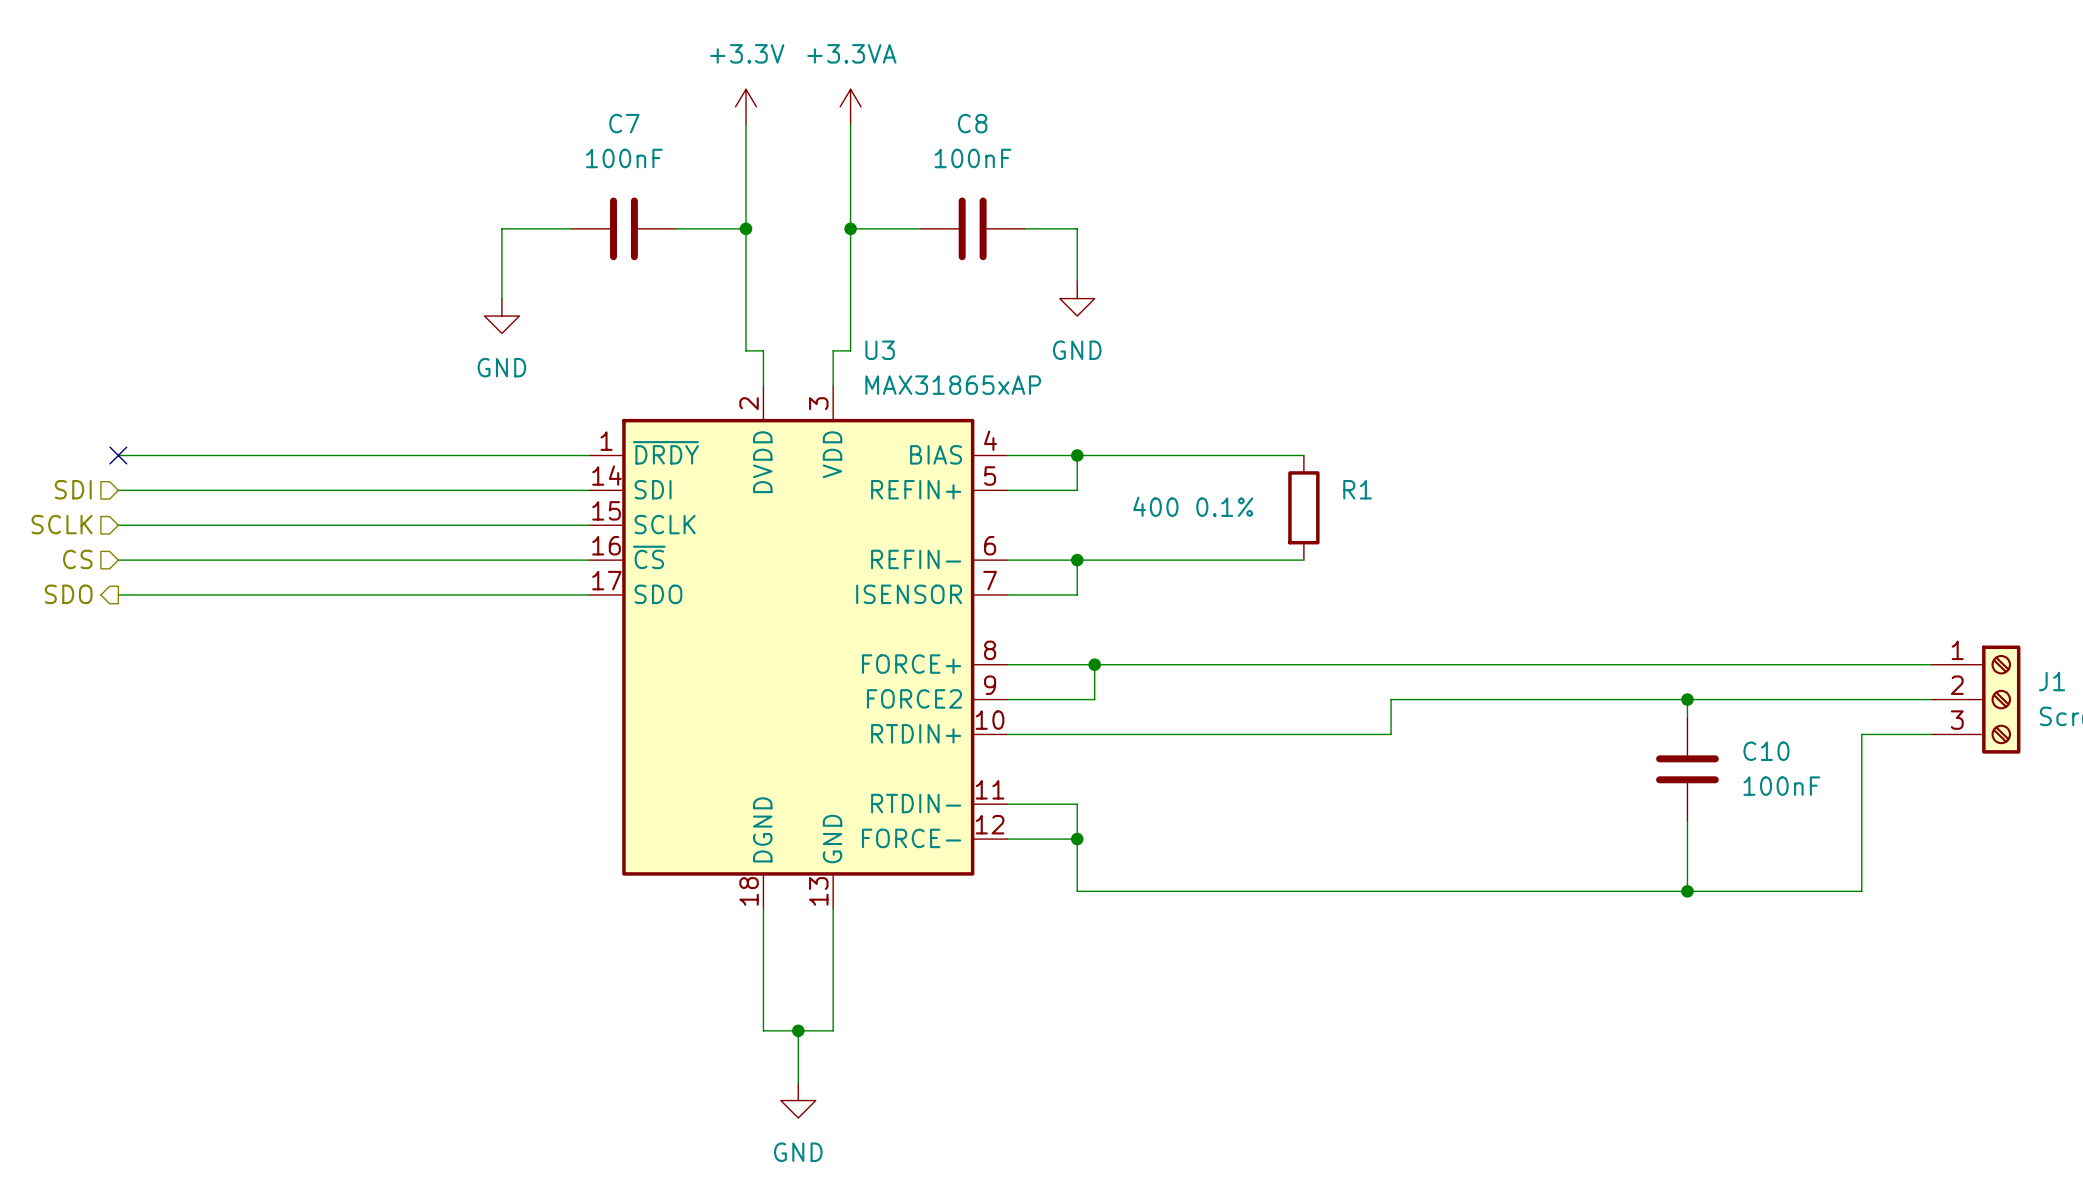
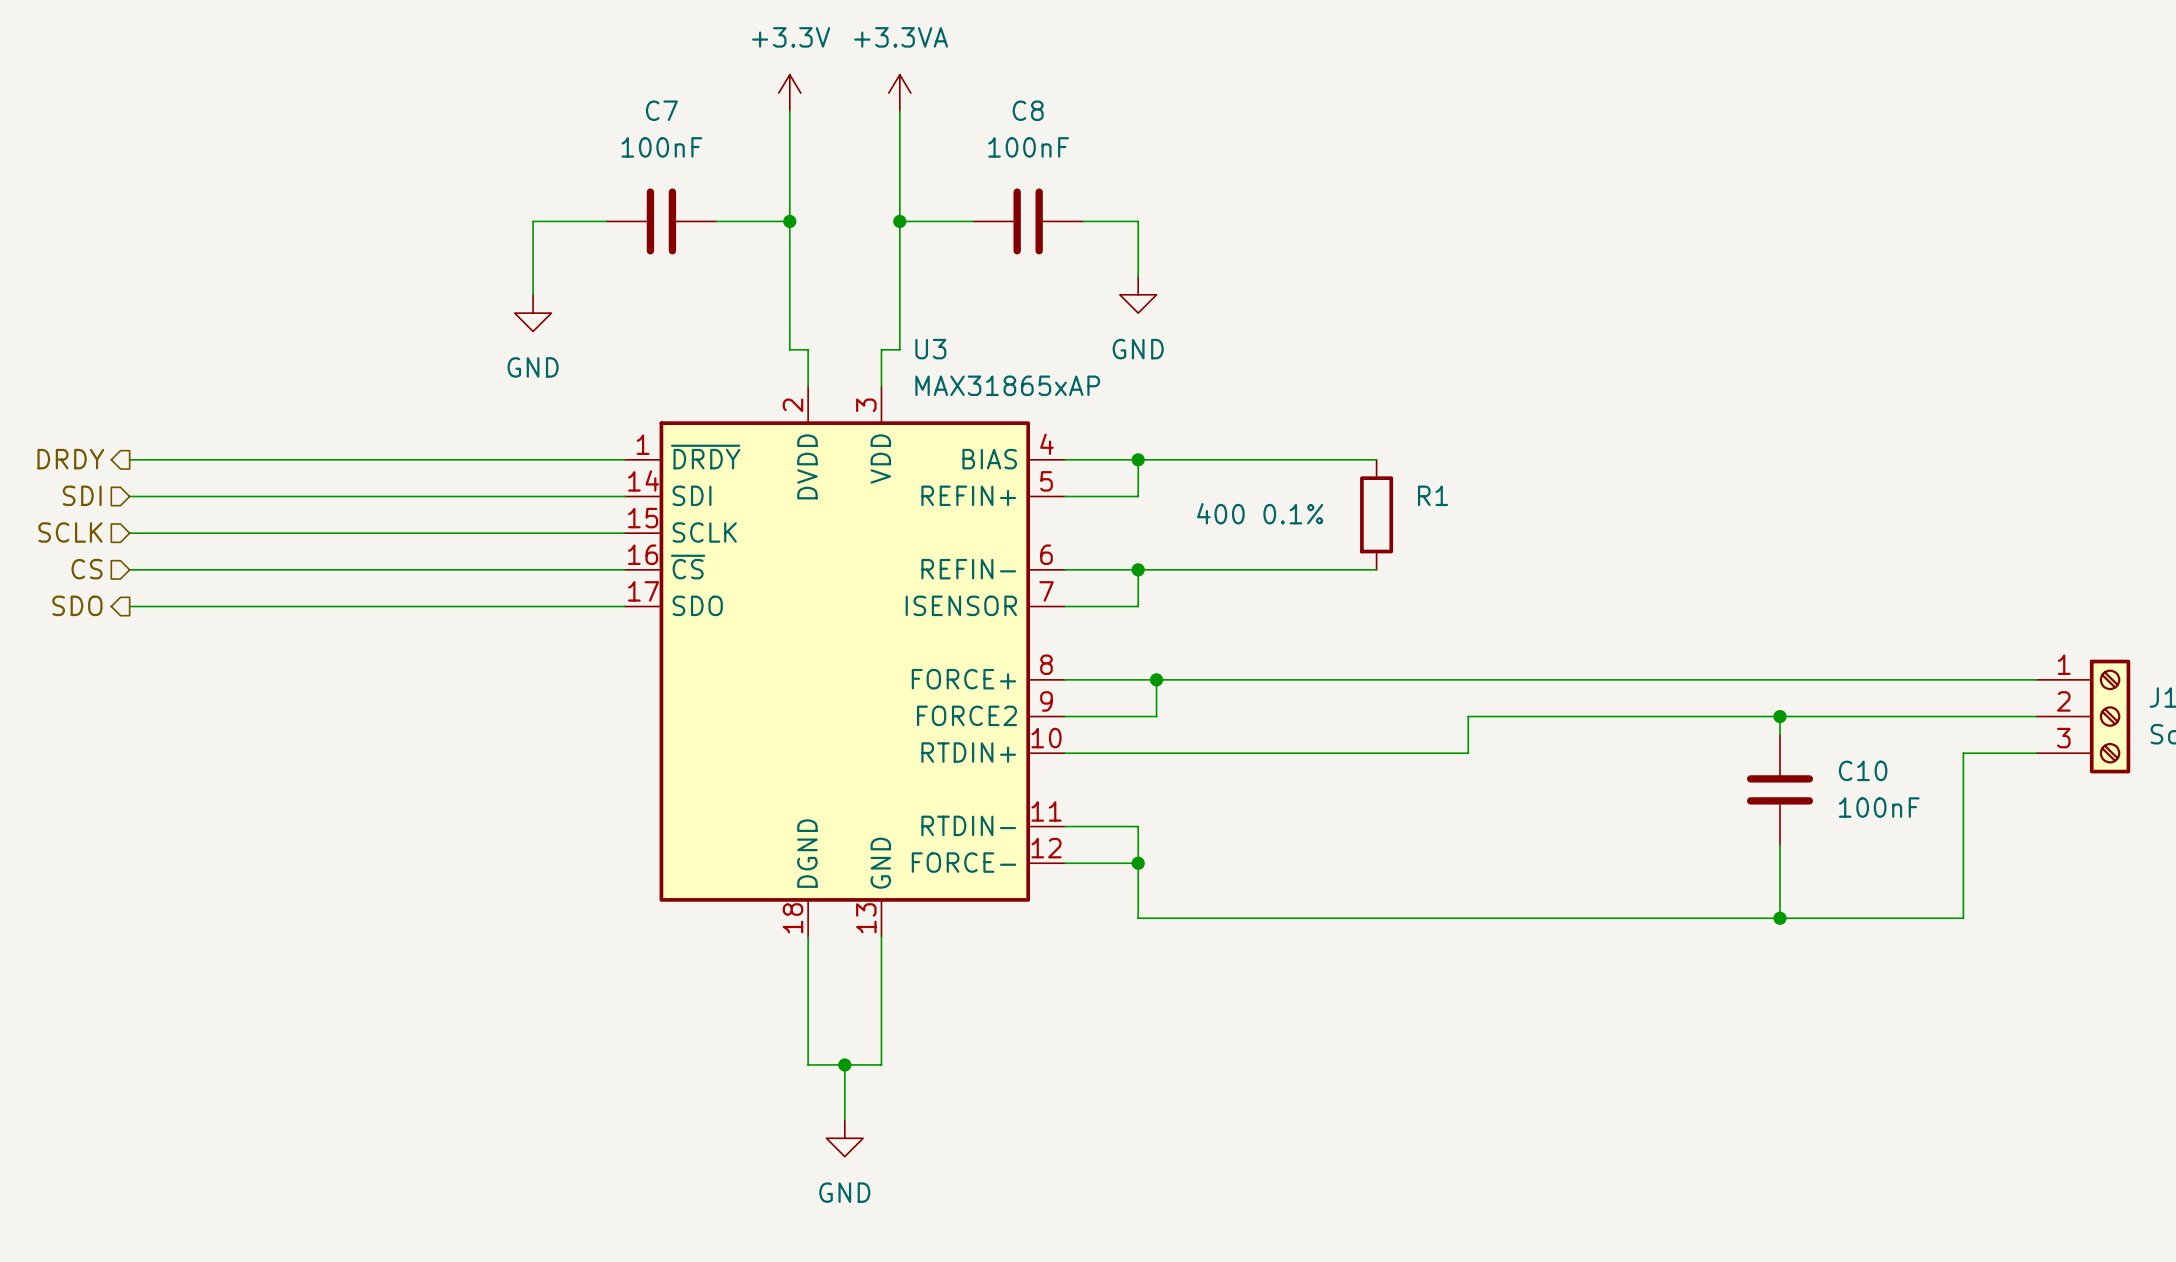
hierarchical label: none -> DRDY (70, 459)
no-connect mark: (118, 455) -> none

